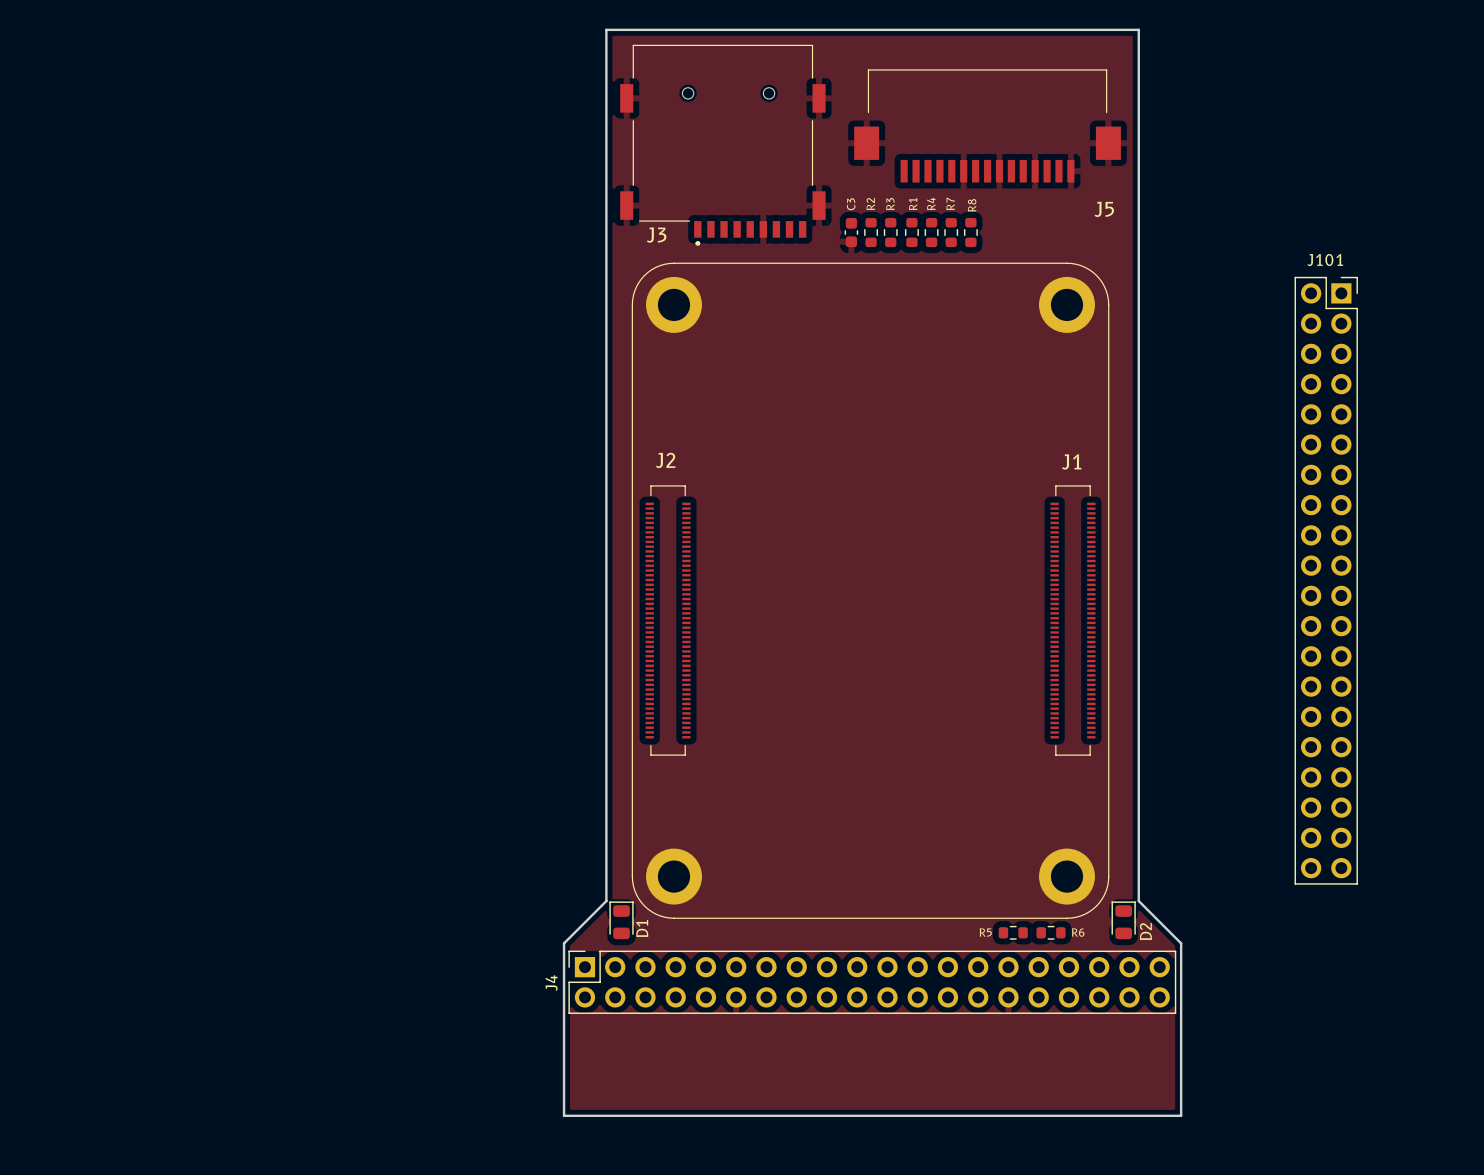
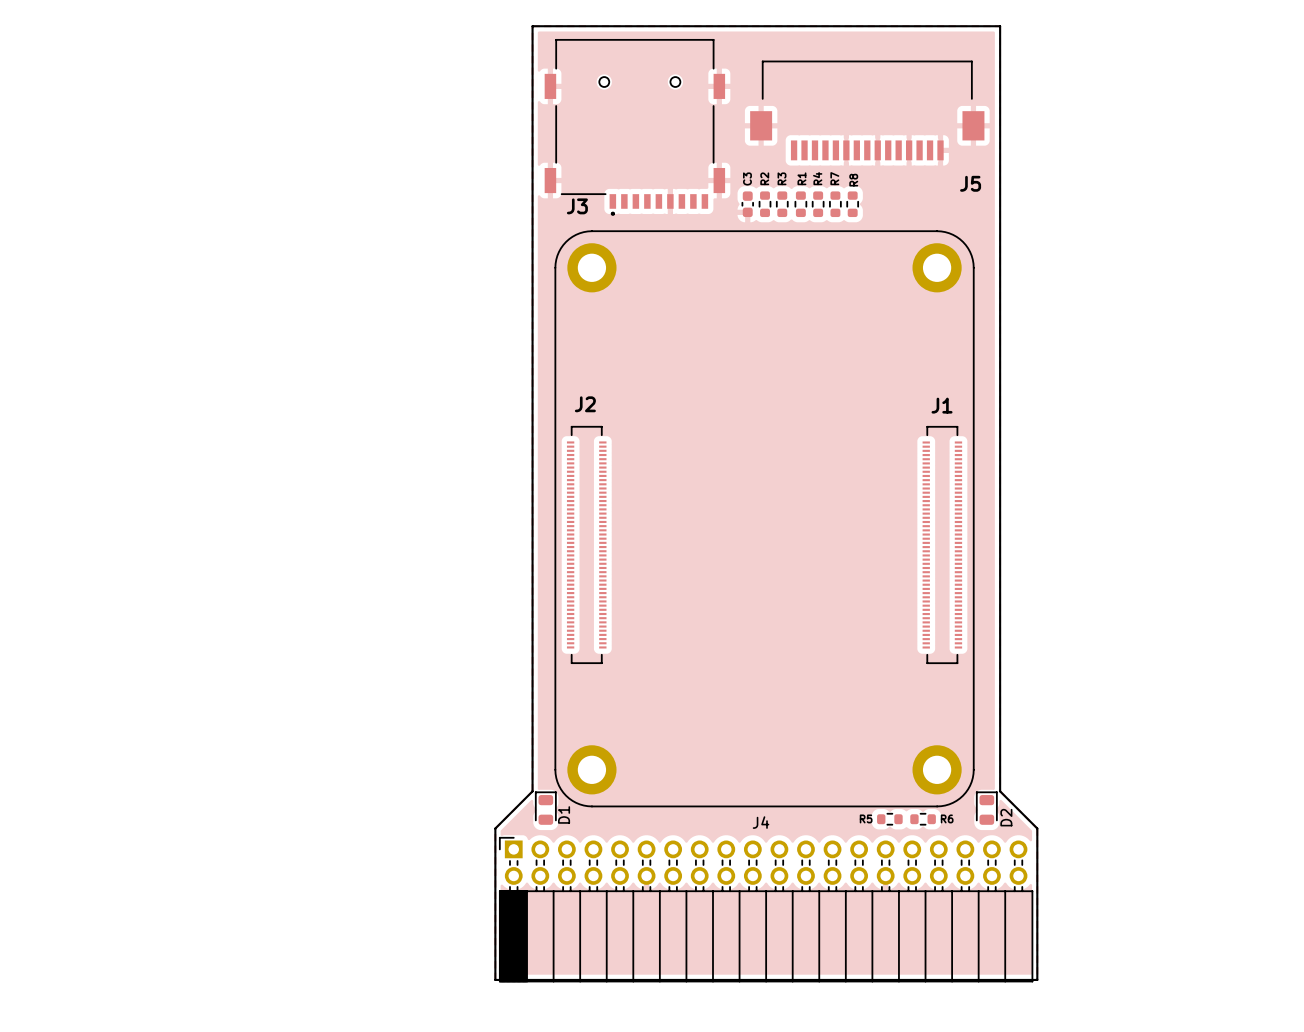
J101: (1326, 580) -> none
J4 footprint: [568, 950, 1177, 1014] -> [499, 837, 1034, 983]
J4 name position: J4 (551, 983) -> J4 (761, 822)

